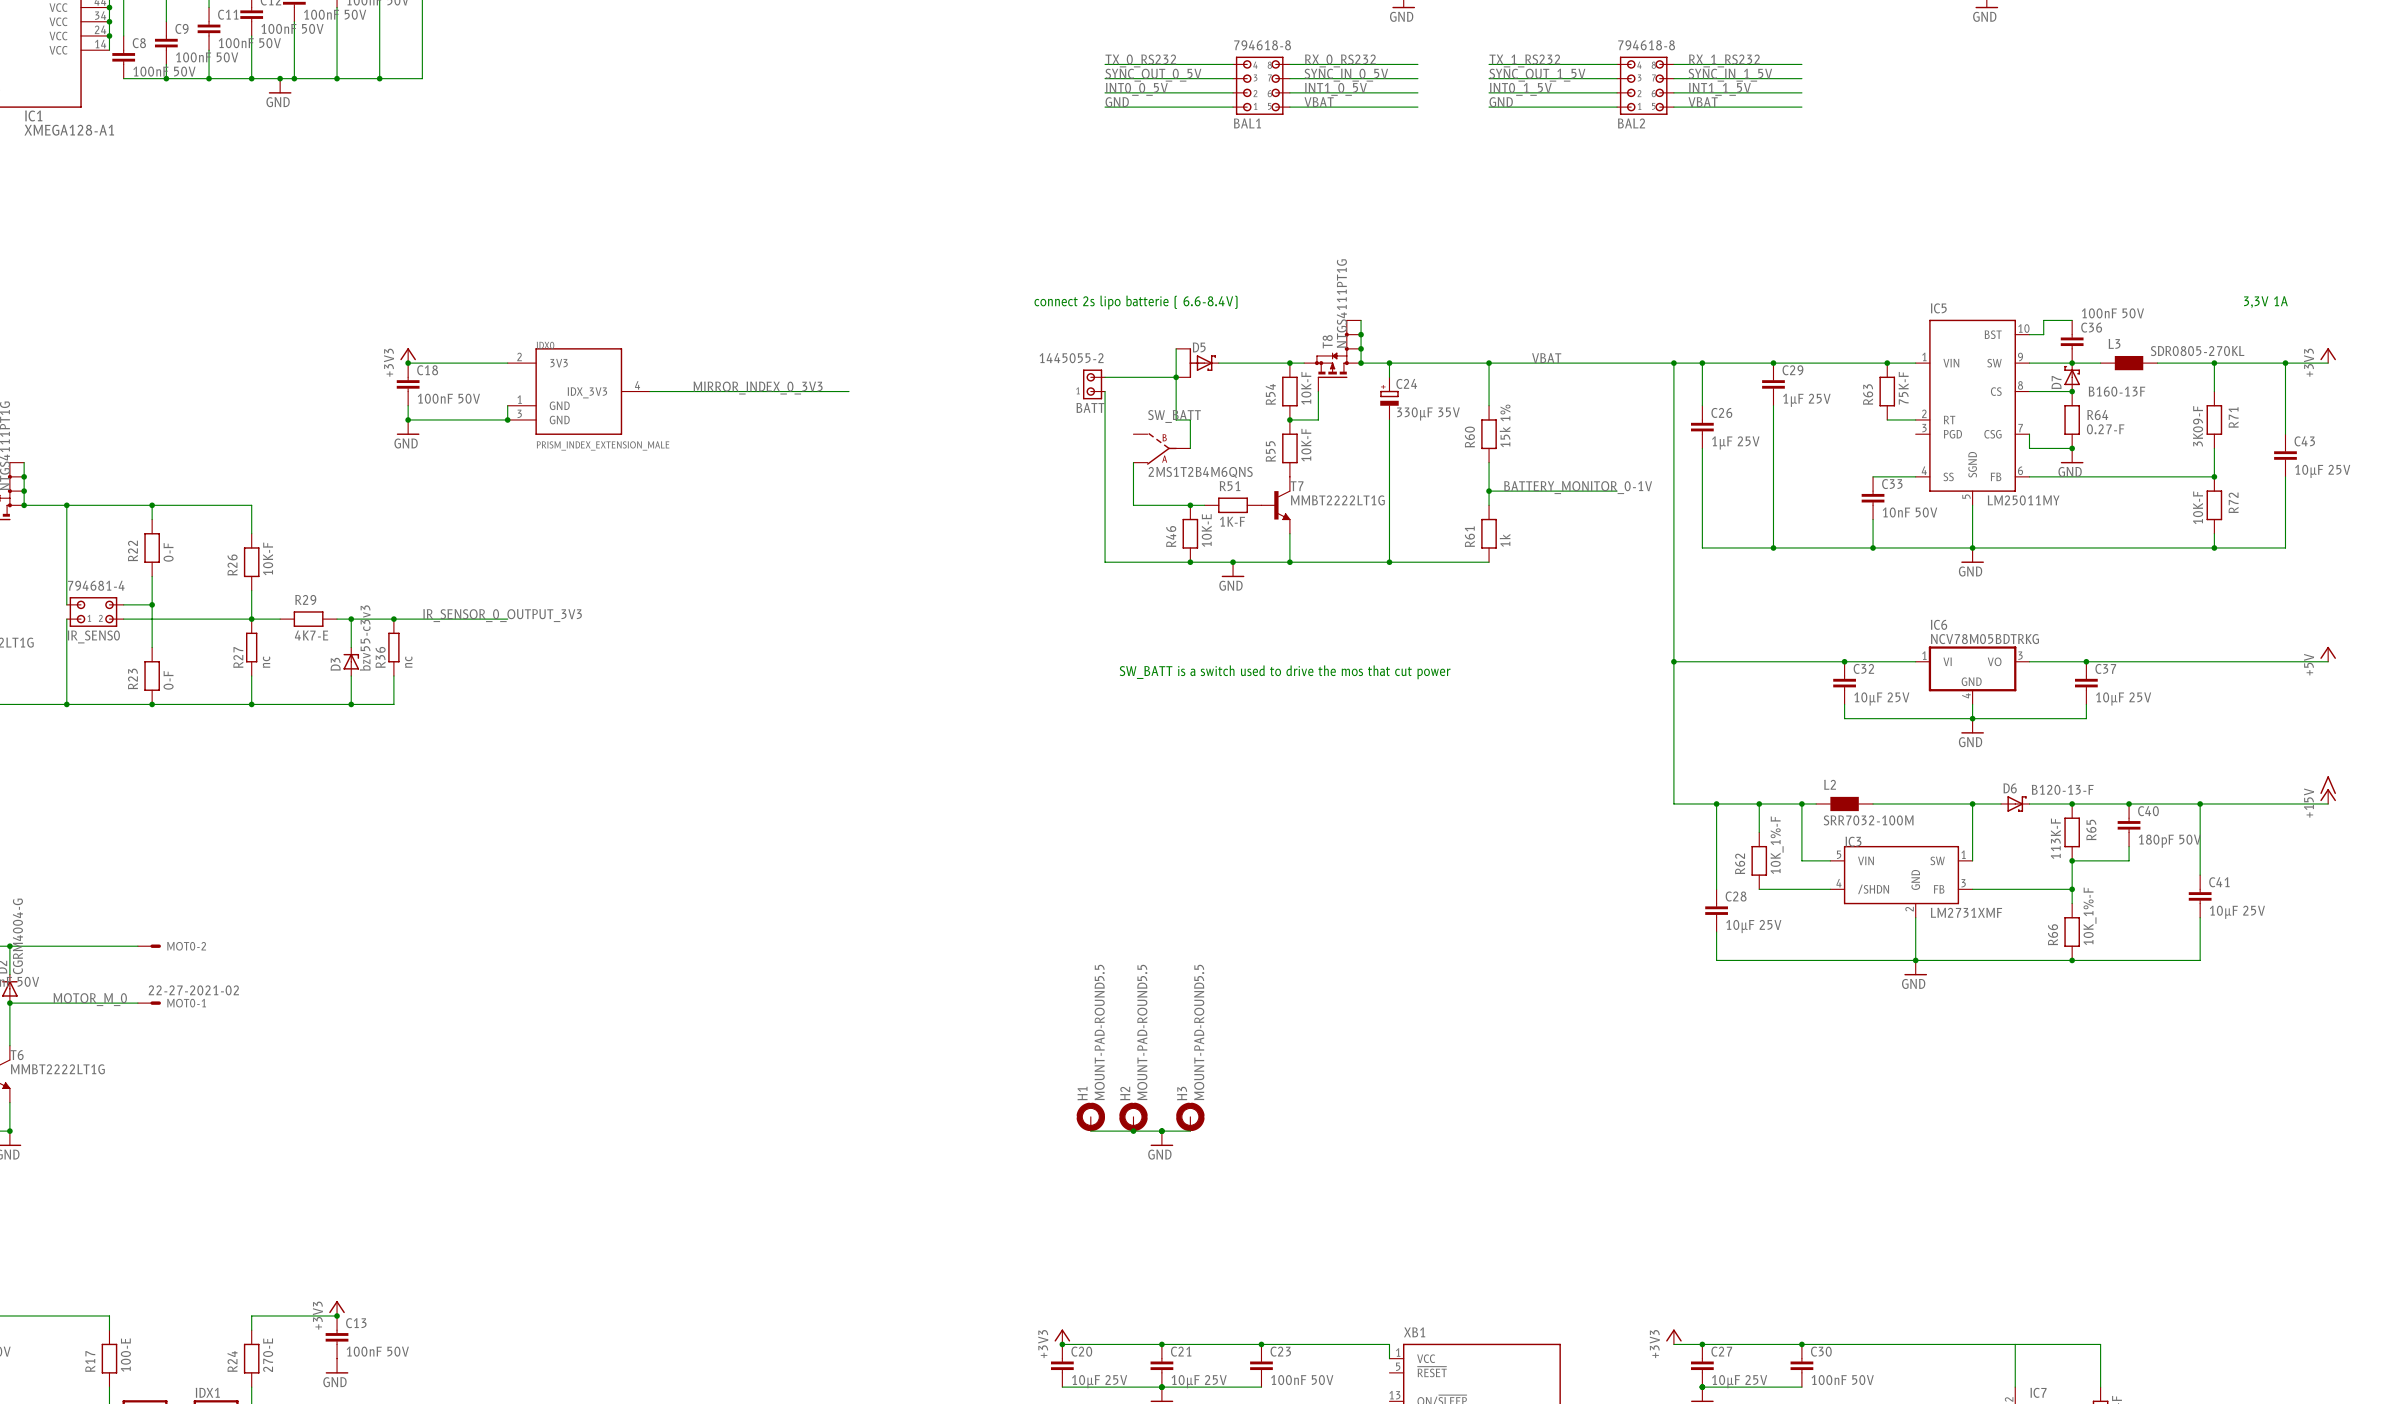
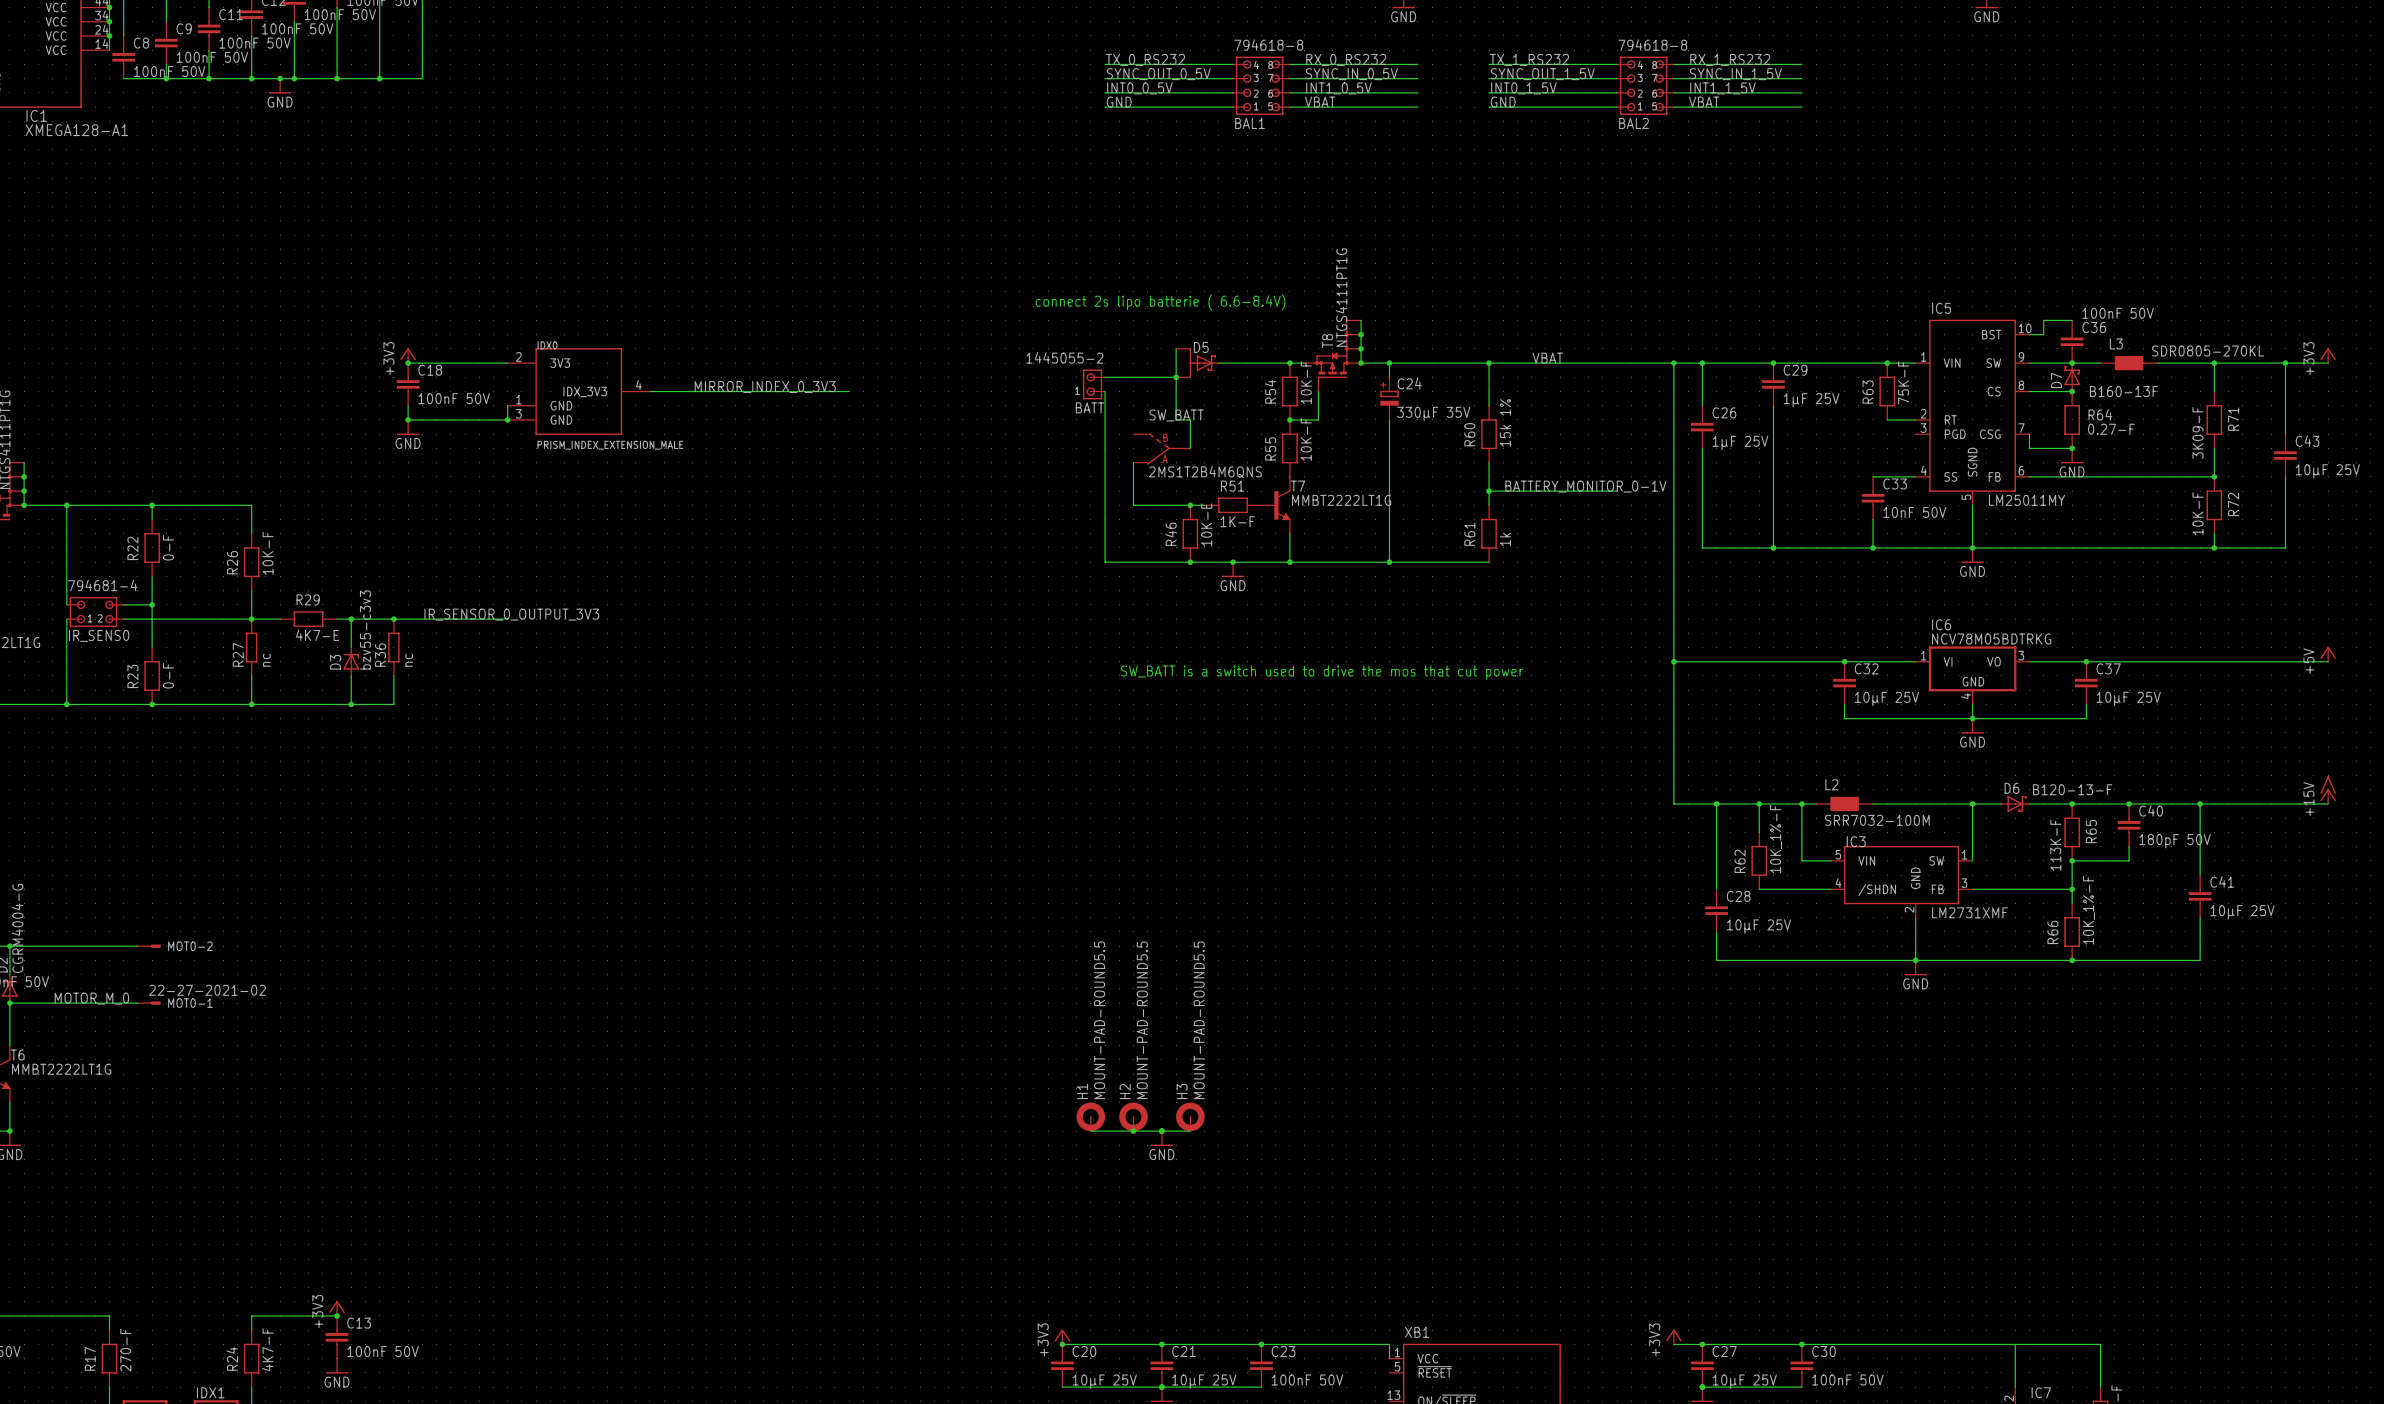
text: 3,3V 1A (2265, 302) -> none
R17 value: 100-E (125, 1355) -> 270-F (125, 1350)
R24 value: 270-E (268, 1355) -> 4K7-F (267, 1349)

